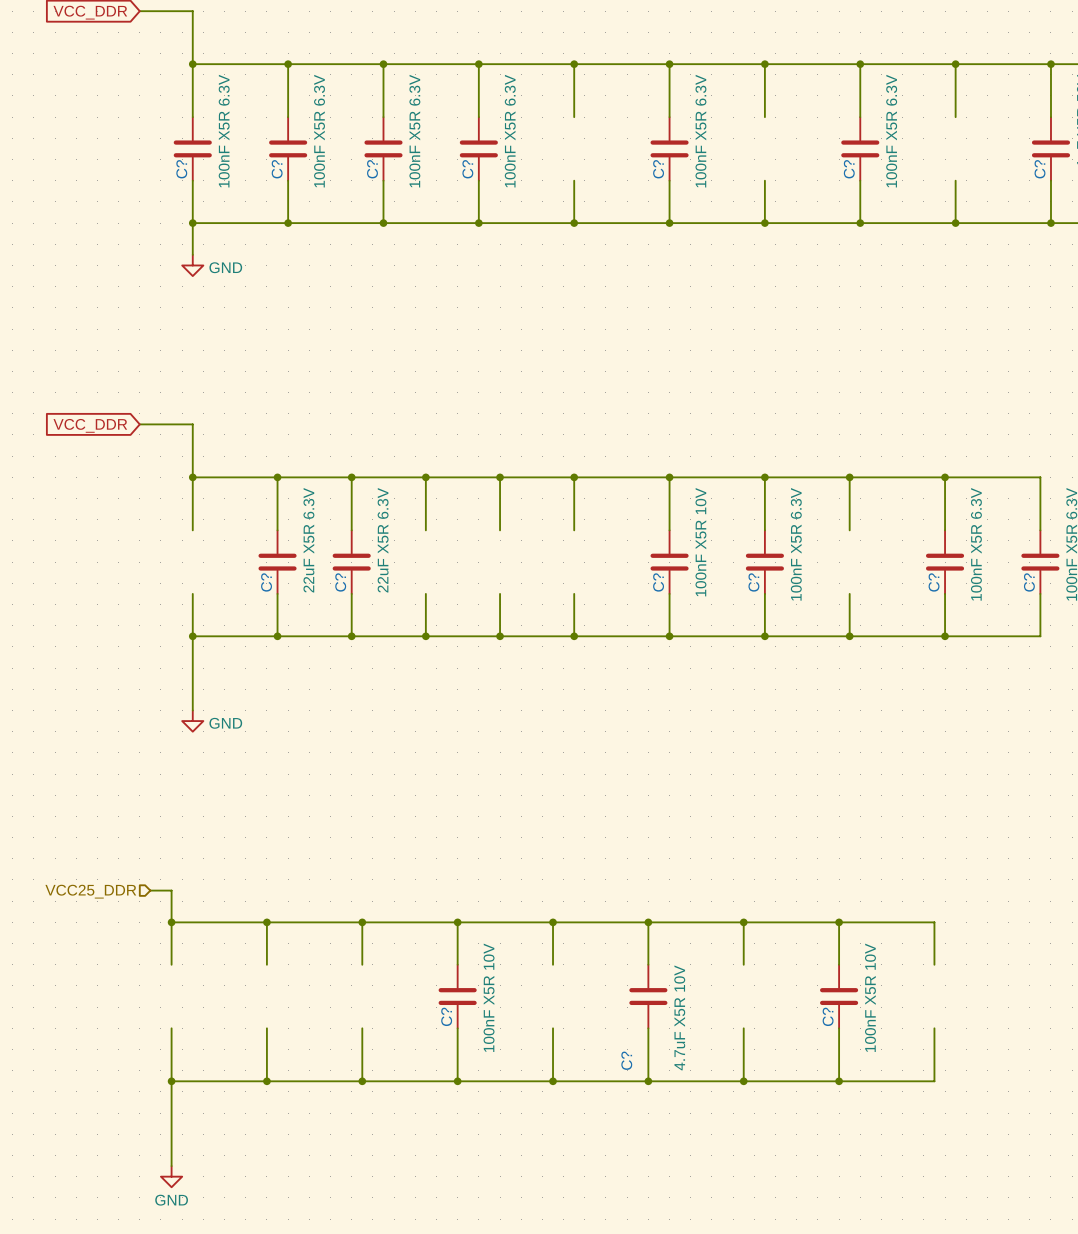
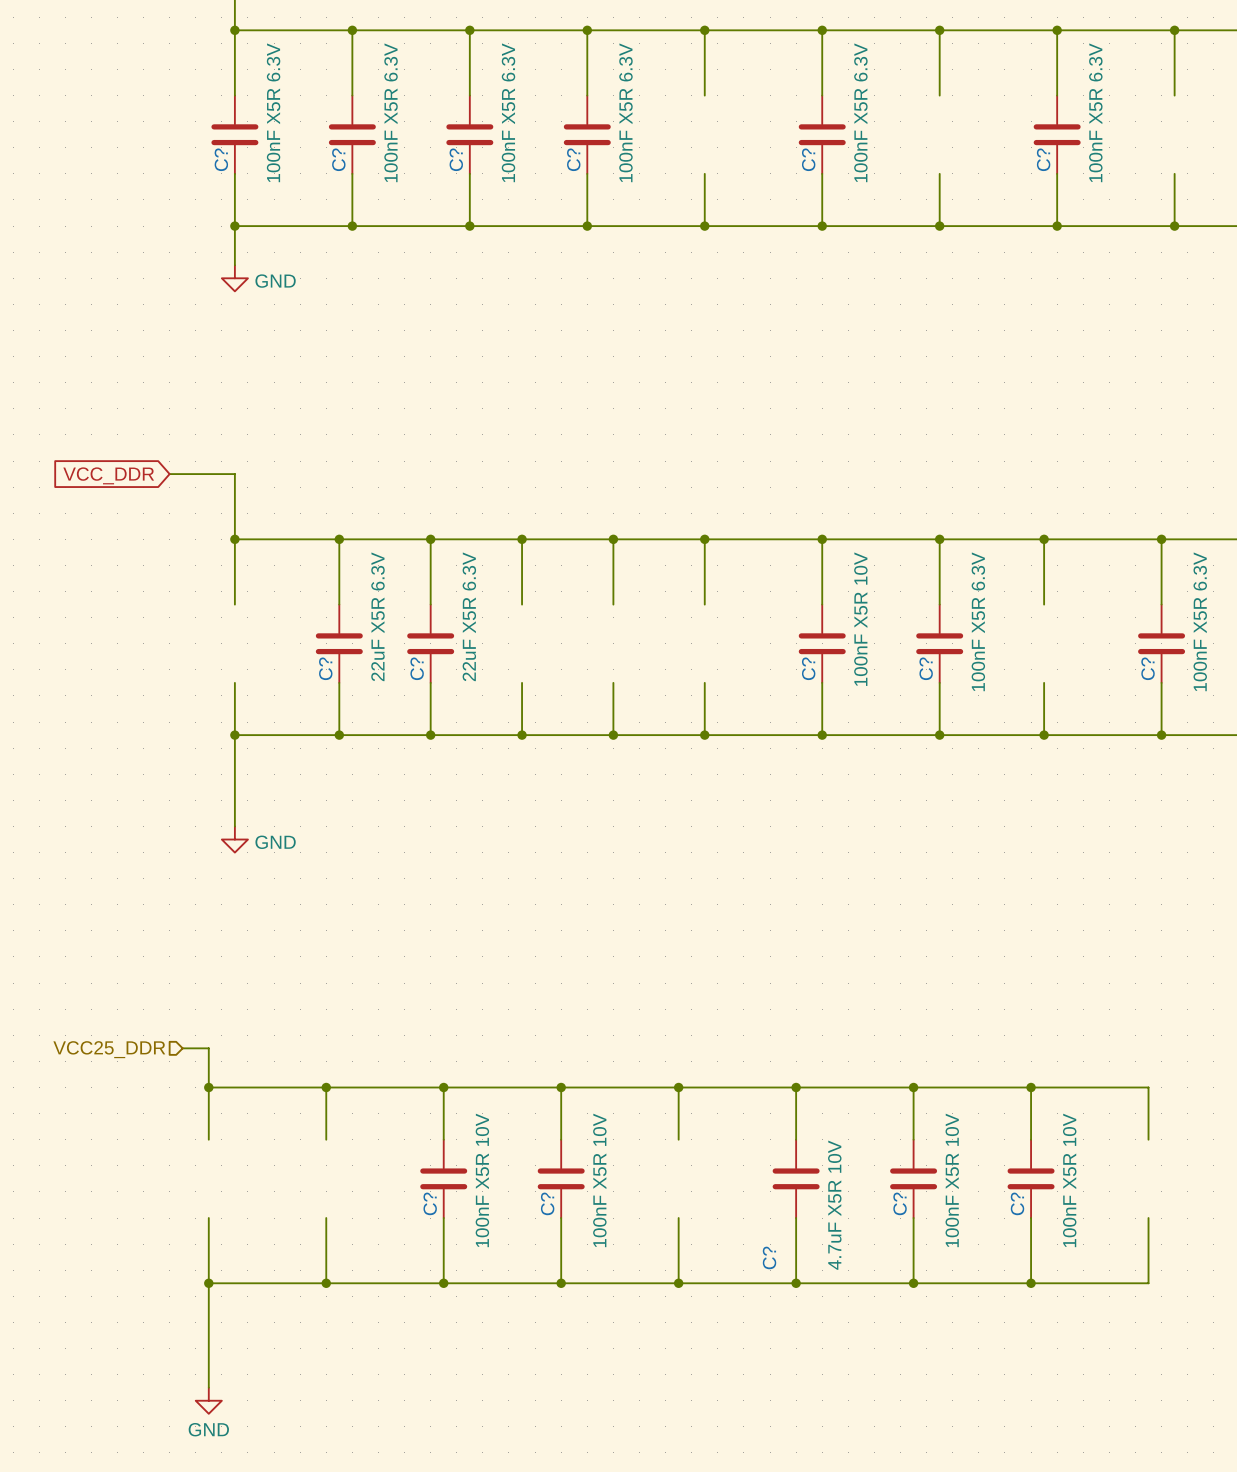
C?: none -> 100nF X5R 10V (443, 1178)
C?: none -> 100nF X5R 10V (913, 1178)

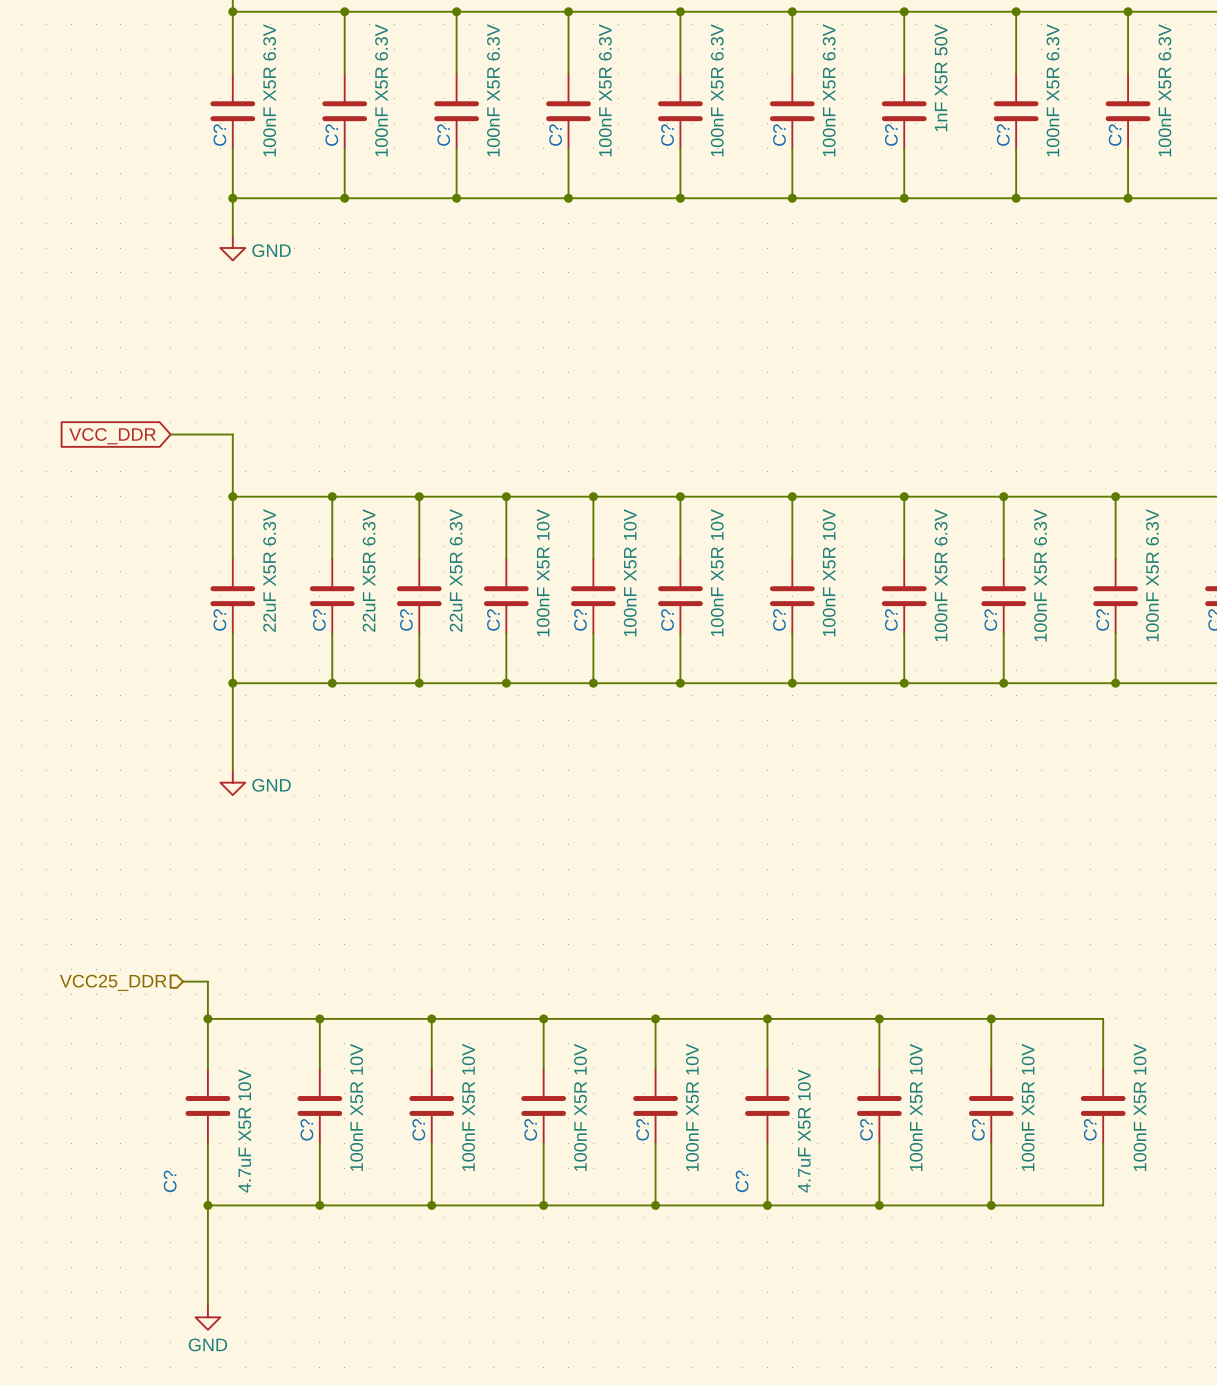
C?: none -> 100nF X5R 6.3V (680, 111)
C?: none -> 1nF X5R 50V (904, 111)
C?: none -> 100nF X5R 6.3V (1128, 111)
C?: none -> 22uF X5R 6.3V (232, 596)
C?: none -> 100nF X5R 10V (506, 596)
C?: none -> 100nF X5R 10V (593, 596)
C?: none -> 100nF X5R 10V (680, 596)
C?: none -> 100nF X5R 6.3V (1003, 596)
C?: none -> 4.7uF X5R 10V (207, 1105)
C?: none -> 100nF X5R 10V (319, 1105)
C?: none -> 100nF X5R 10V (655, 1105)
C?: none -> 100nF X5R 10V (1103, 1105)

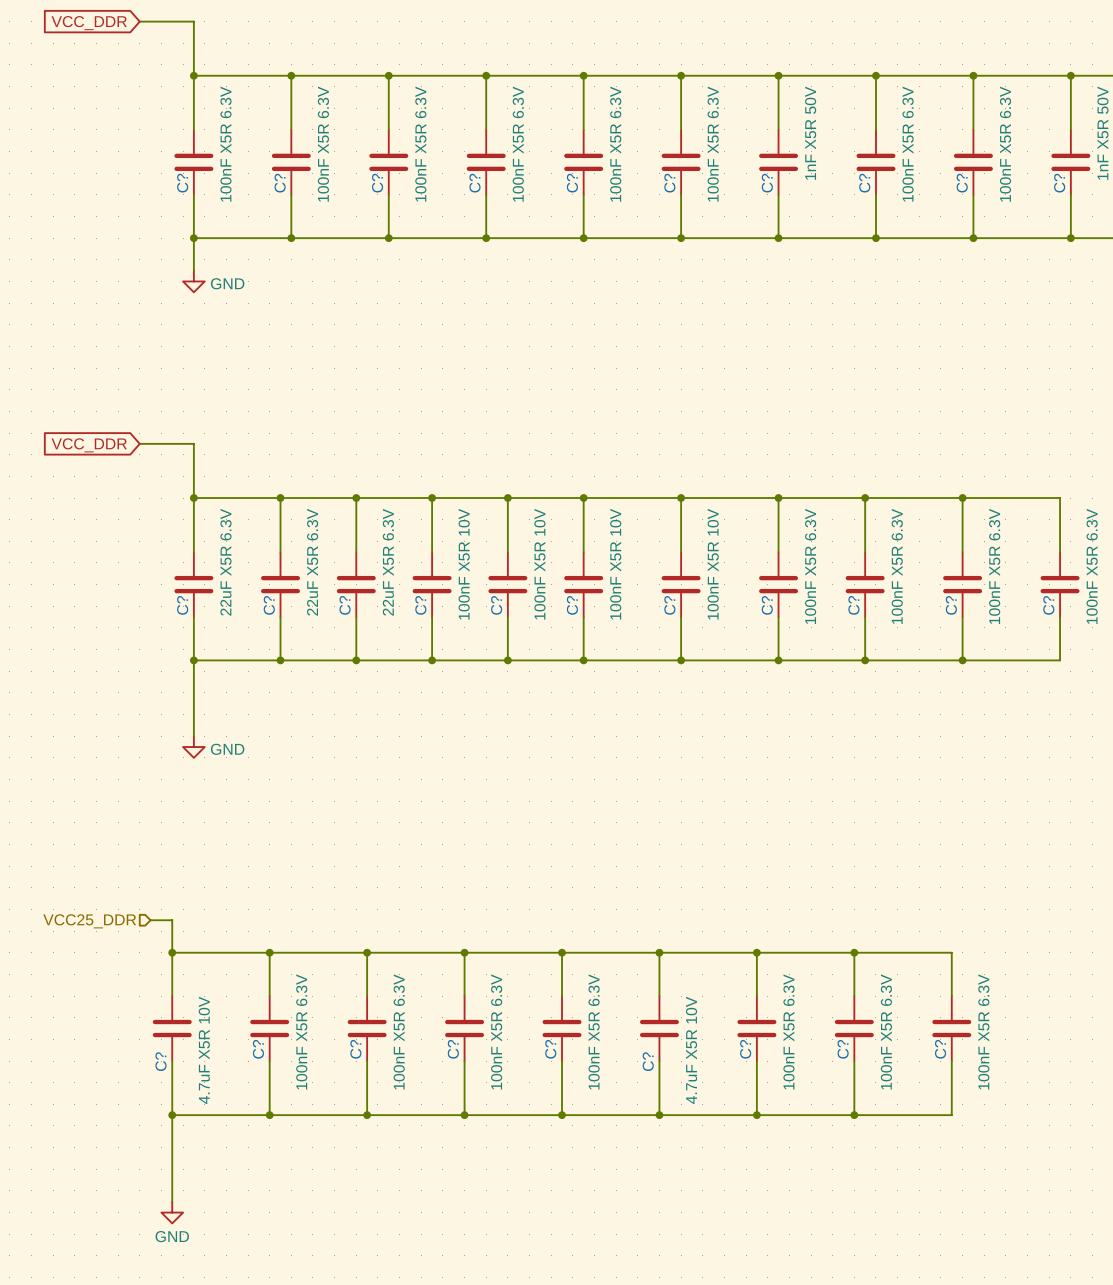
C? value: 100nF X5R 10V (356, 1107) -> 100nF X5R 6.3V (301, 1031)
C? value: 100nF X5R 10V (468, 1107) -> 100nF X5R 6.3V (399, 1031)
C? value: 100nF X5R 10V (580, 1107) -> 100nF X5R 6.3V (496, 1031)
C? value: 100nF X5R 10V (692, 1107) -> 100nF X5R 6.3V (594, 1031)
C? value: 100nF X5R 10V (916, 1107) -> 100nF X5R 6.3V (788, 1031)
C? value: 100nF X5R 10V (1028, 1107) -> 100nF X5R 6.3V (886, 1031)
C? value: 100nF X5R 10V (1140, 1107) -> 100nF X5R 6.3V (983, 1031)
C? name position: C? (170, 1181) -> C? (161, 1061)
C? name position: C? (742, 1181) -> C? (648, 1061)

